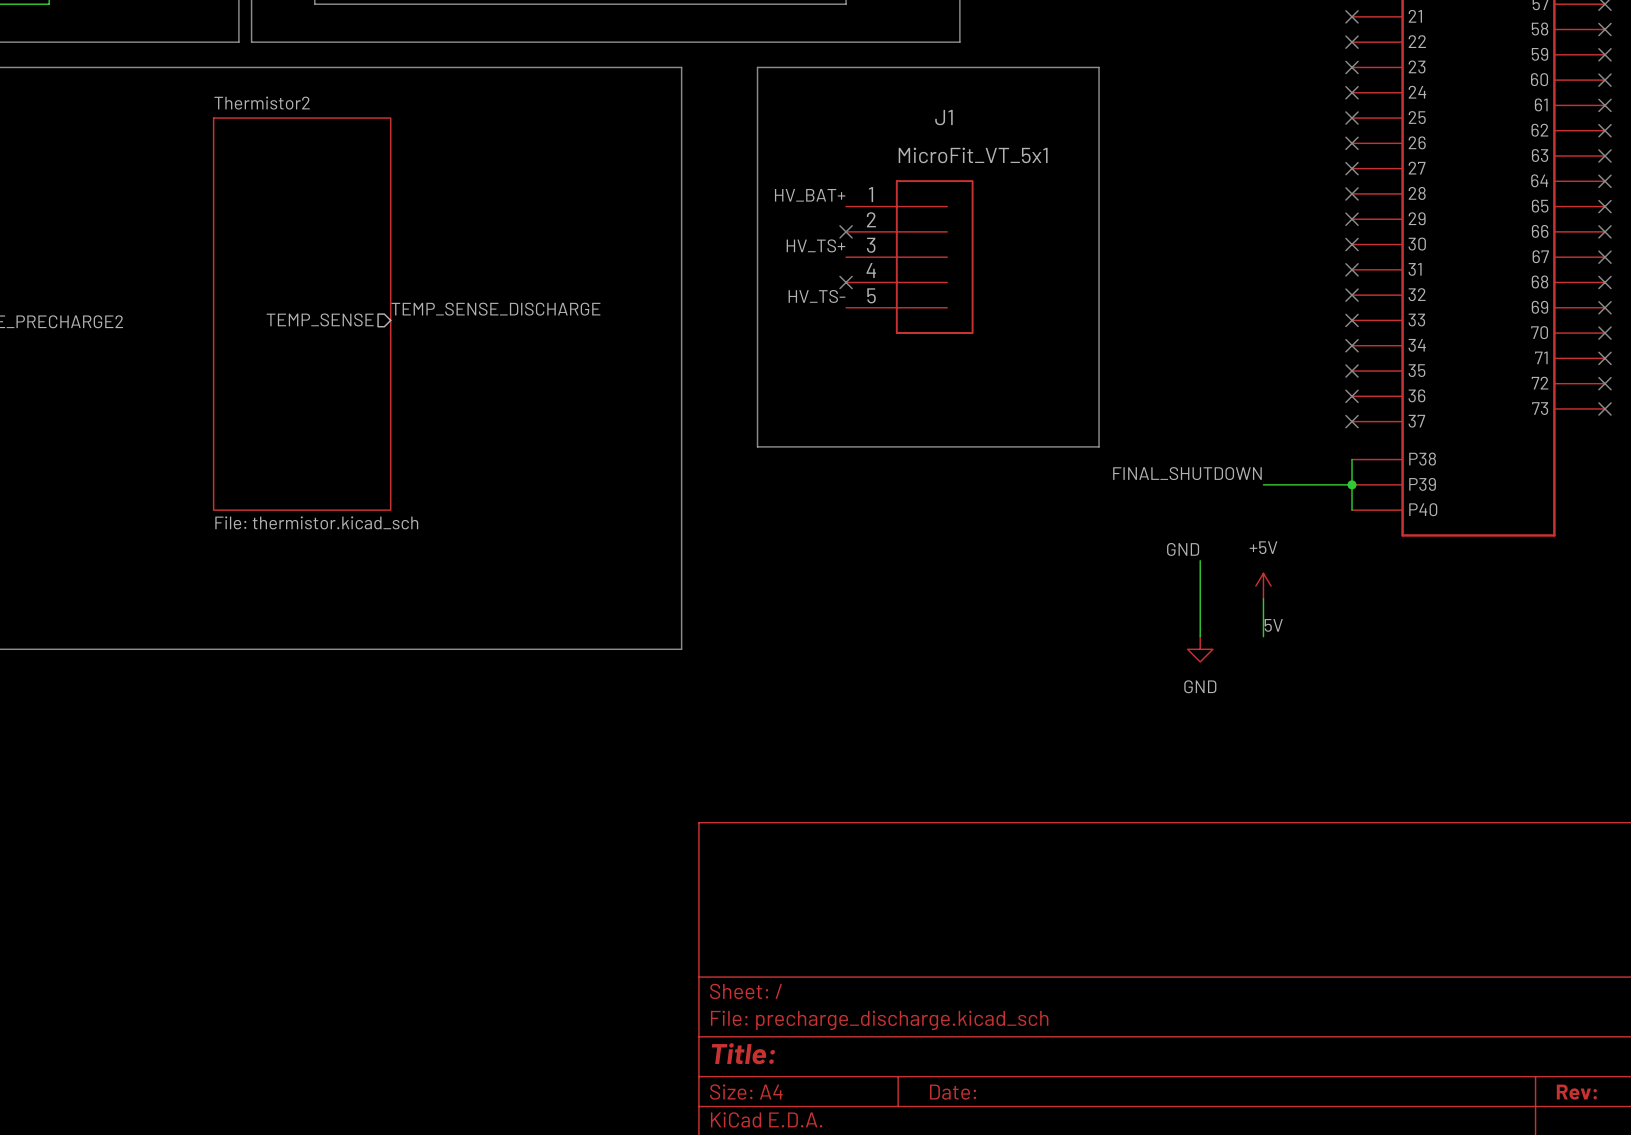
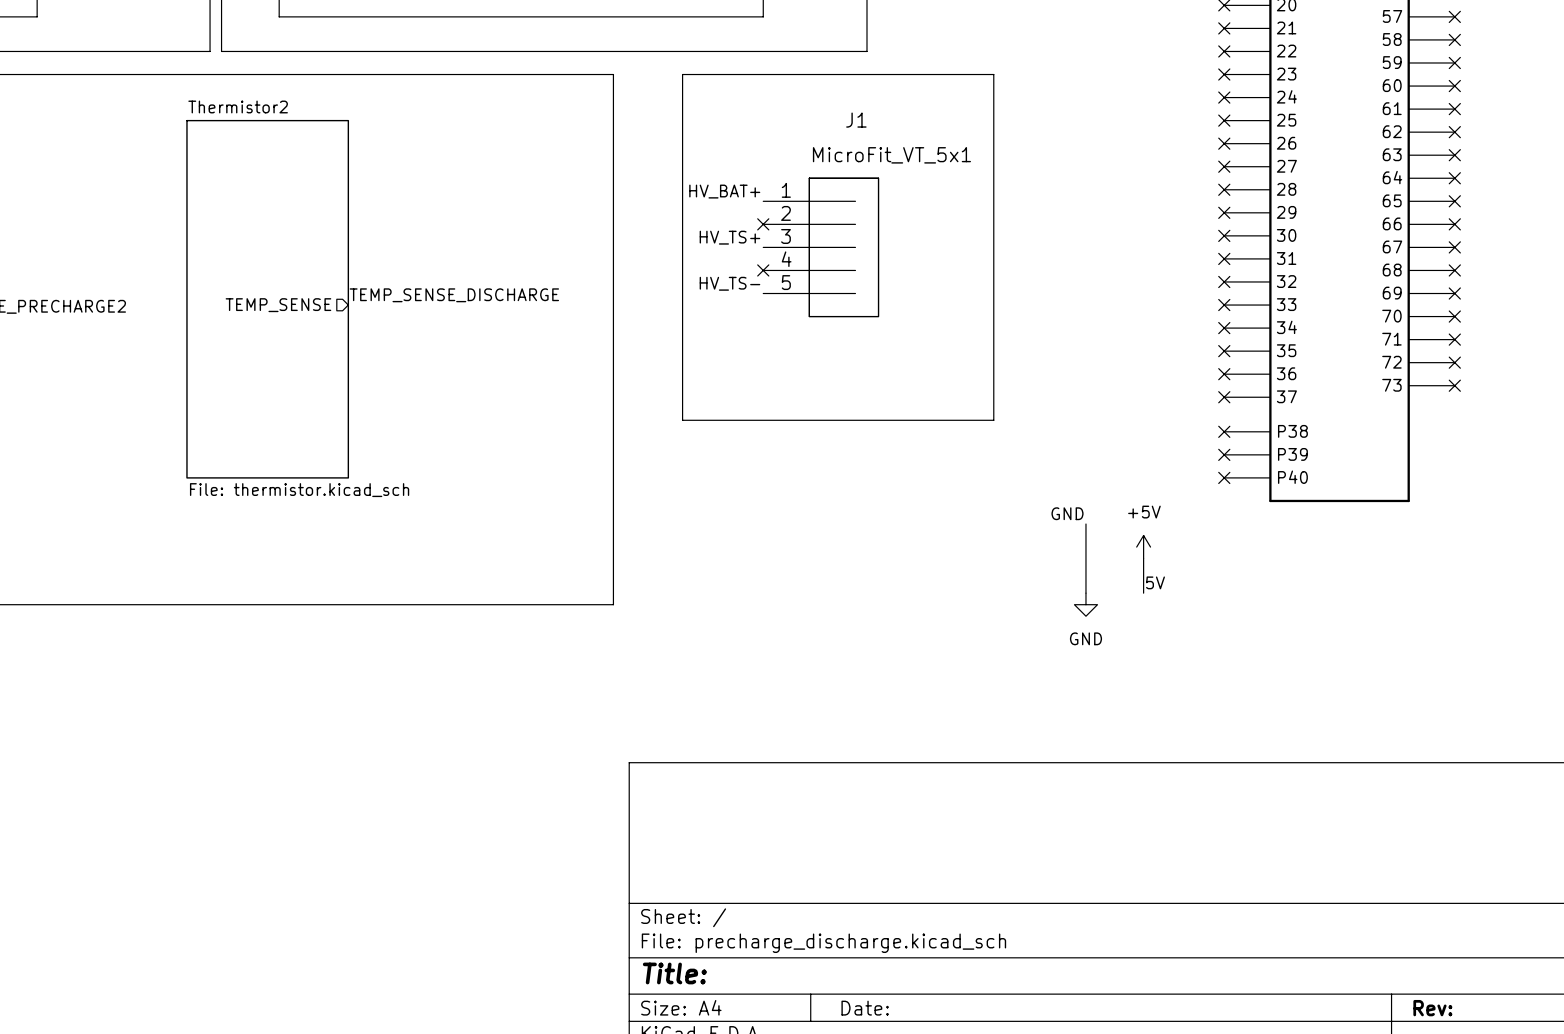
wire: (1352, 459) (1352, 510) -> none
no-connect mark: none -> (1224, 431)
label: FINAL_SHUTDOWN (1187, 473) -> none
wire: (1263, 484) (1352, 484) -> none
junction: (1352, 484) -> none
no-connect mark: none -> (1224, 454)
no-connect mark: none -> (1224, 477)

